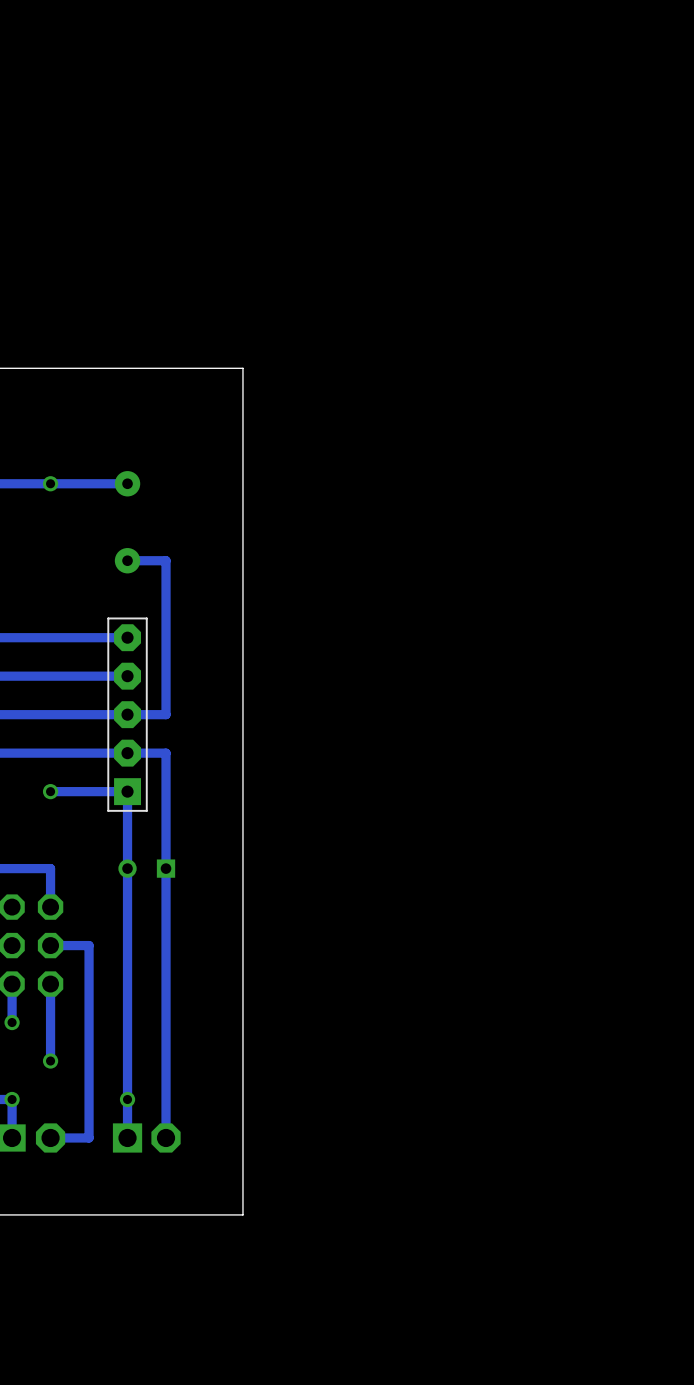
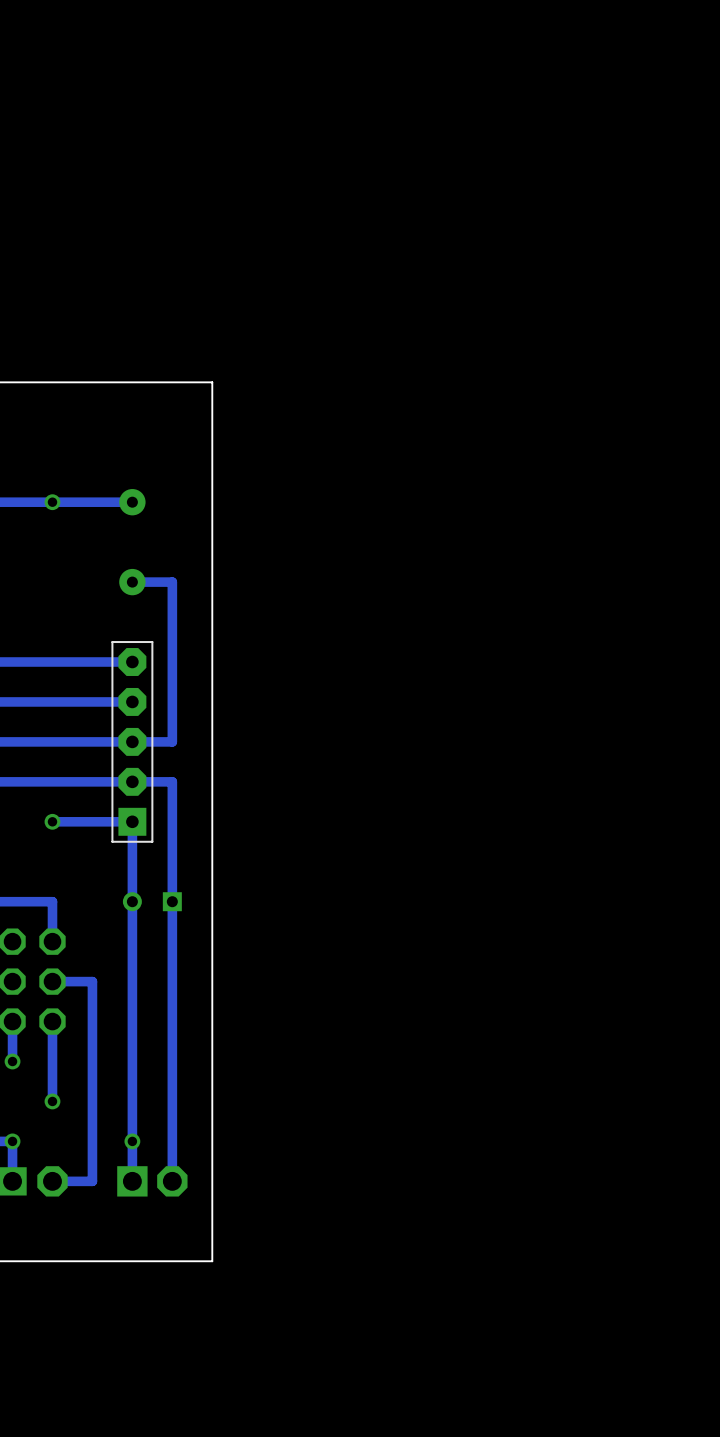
board edge: (204, 368) (242, 368) (242, 1214) (204, 1214) -> (212, 382) (212, 1261)

